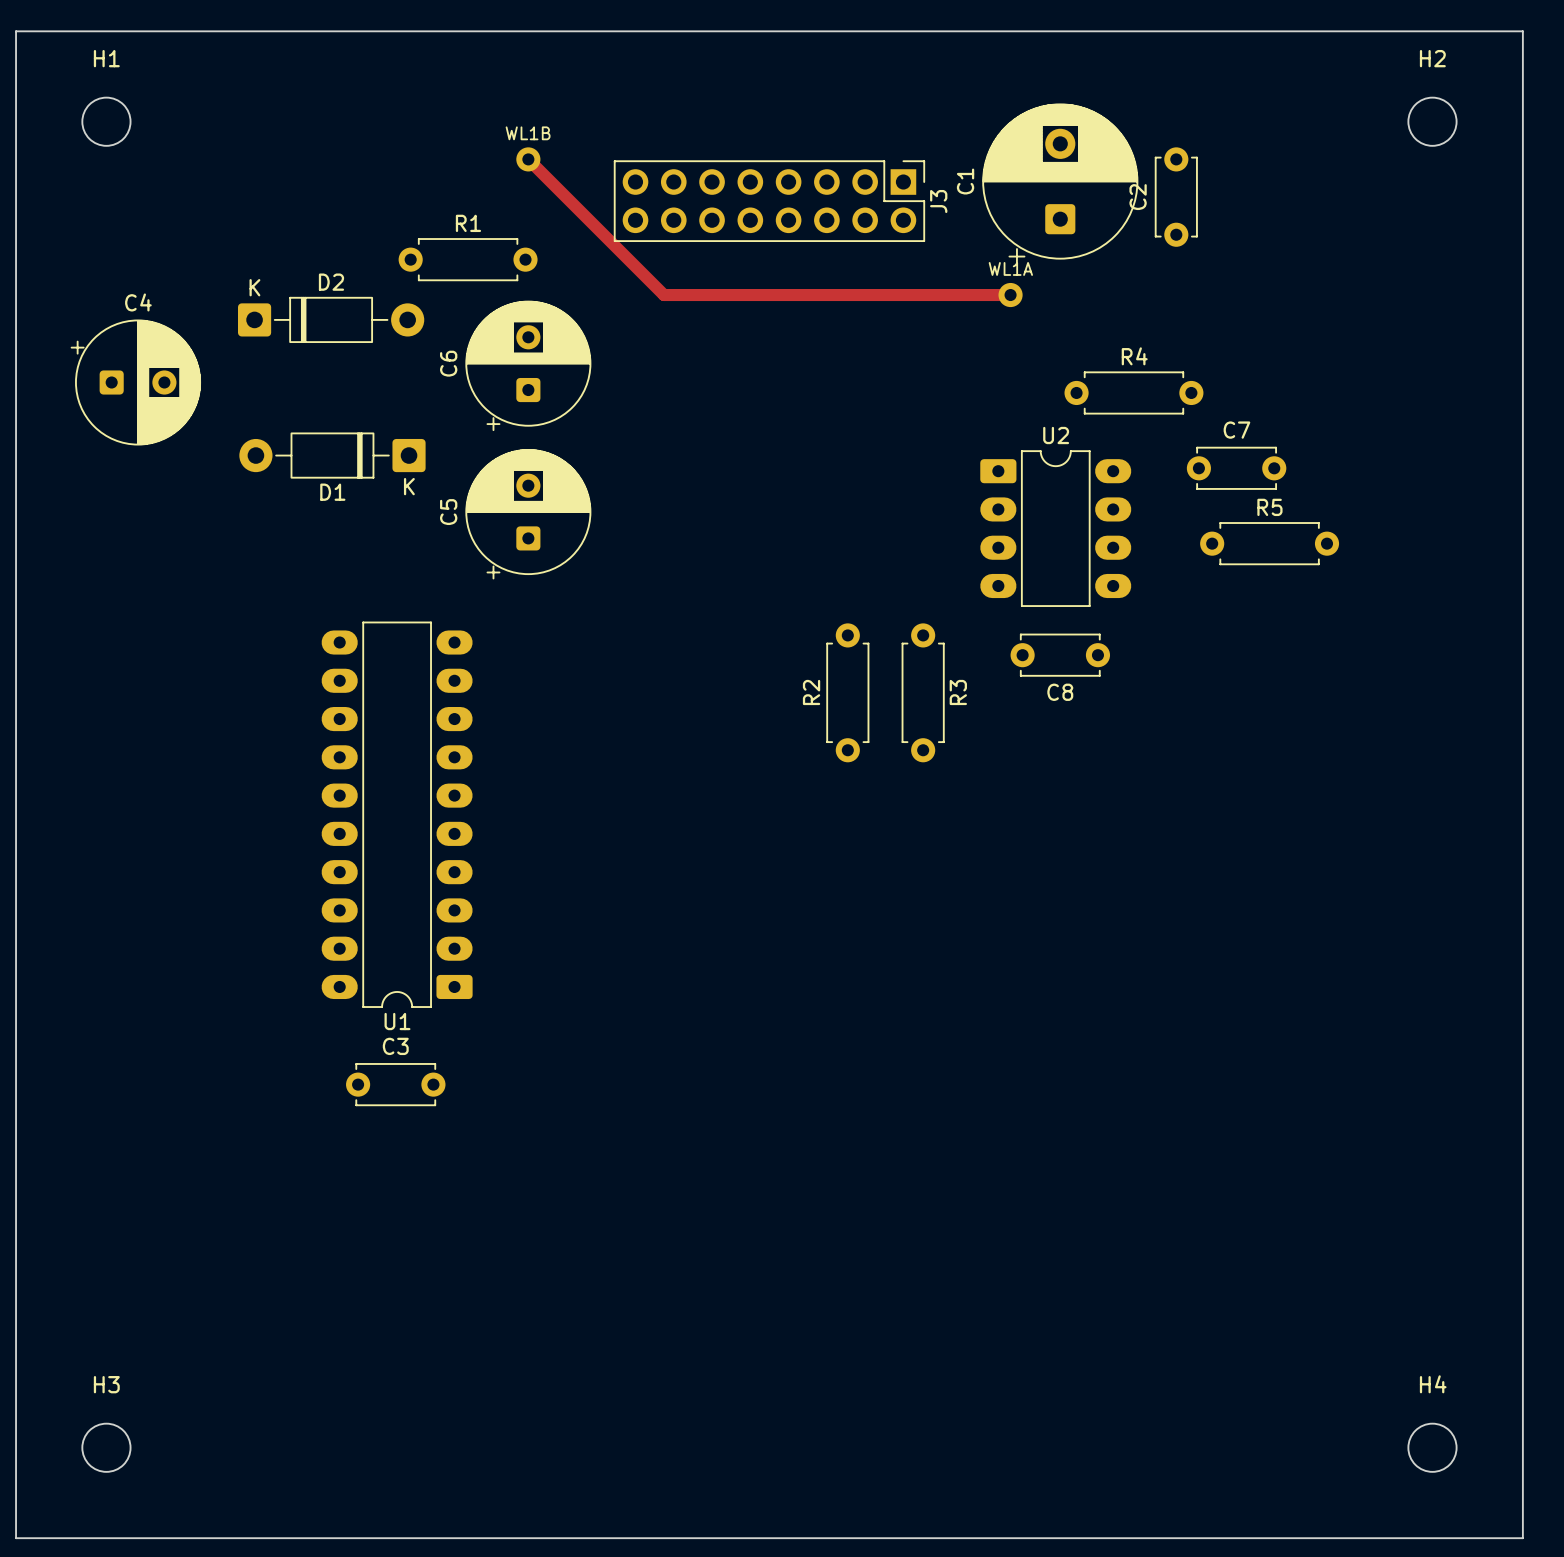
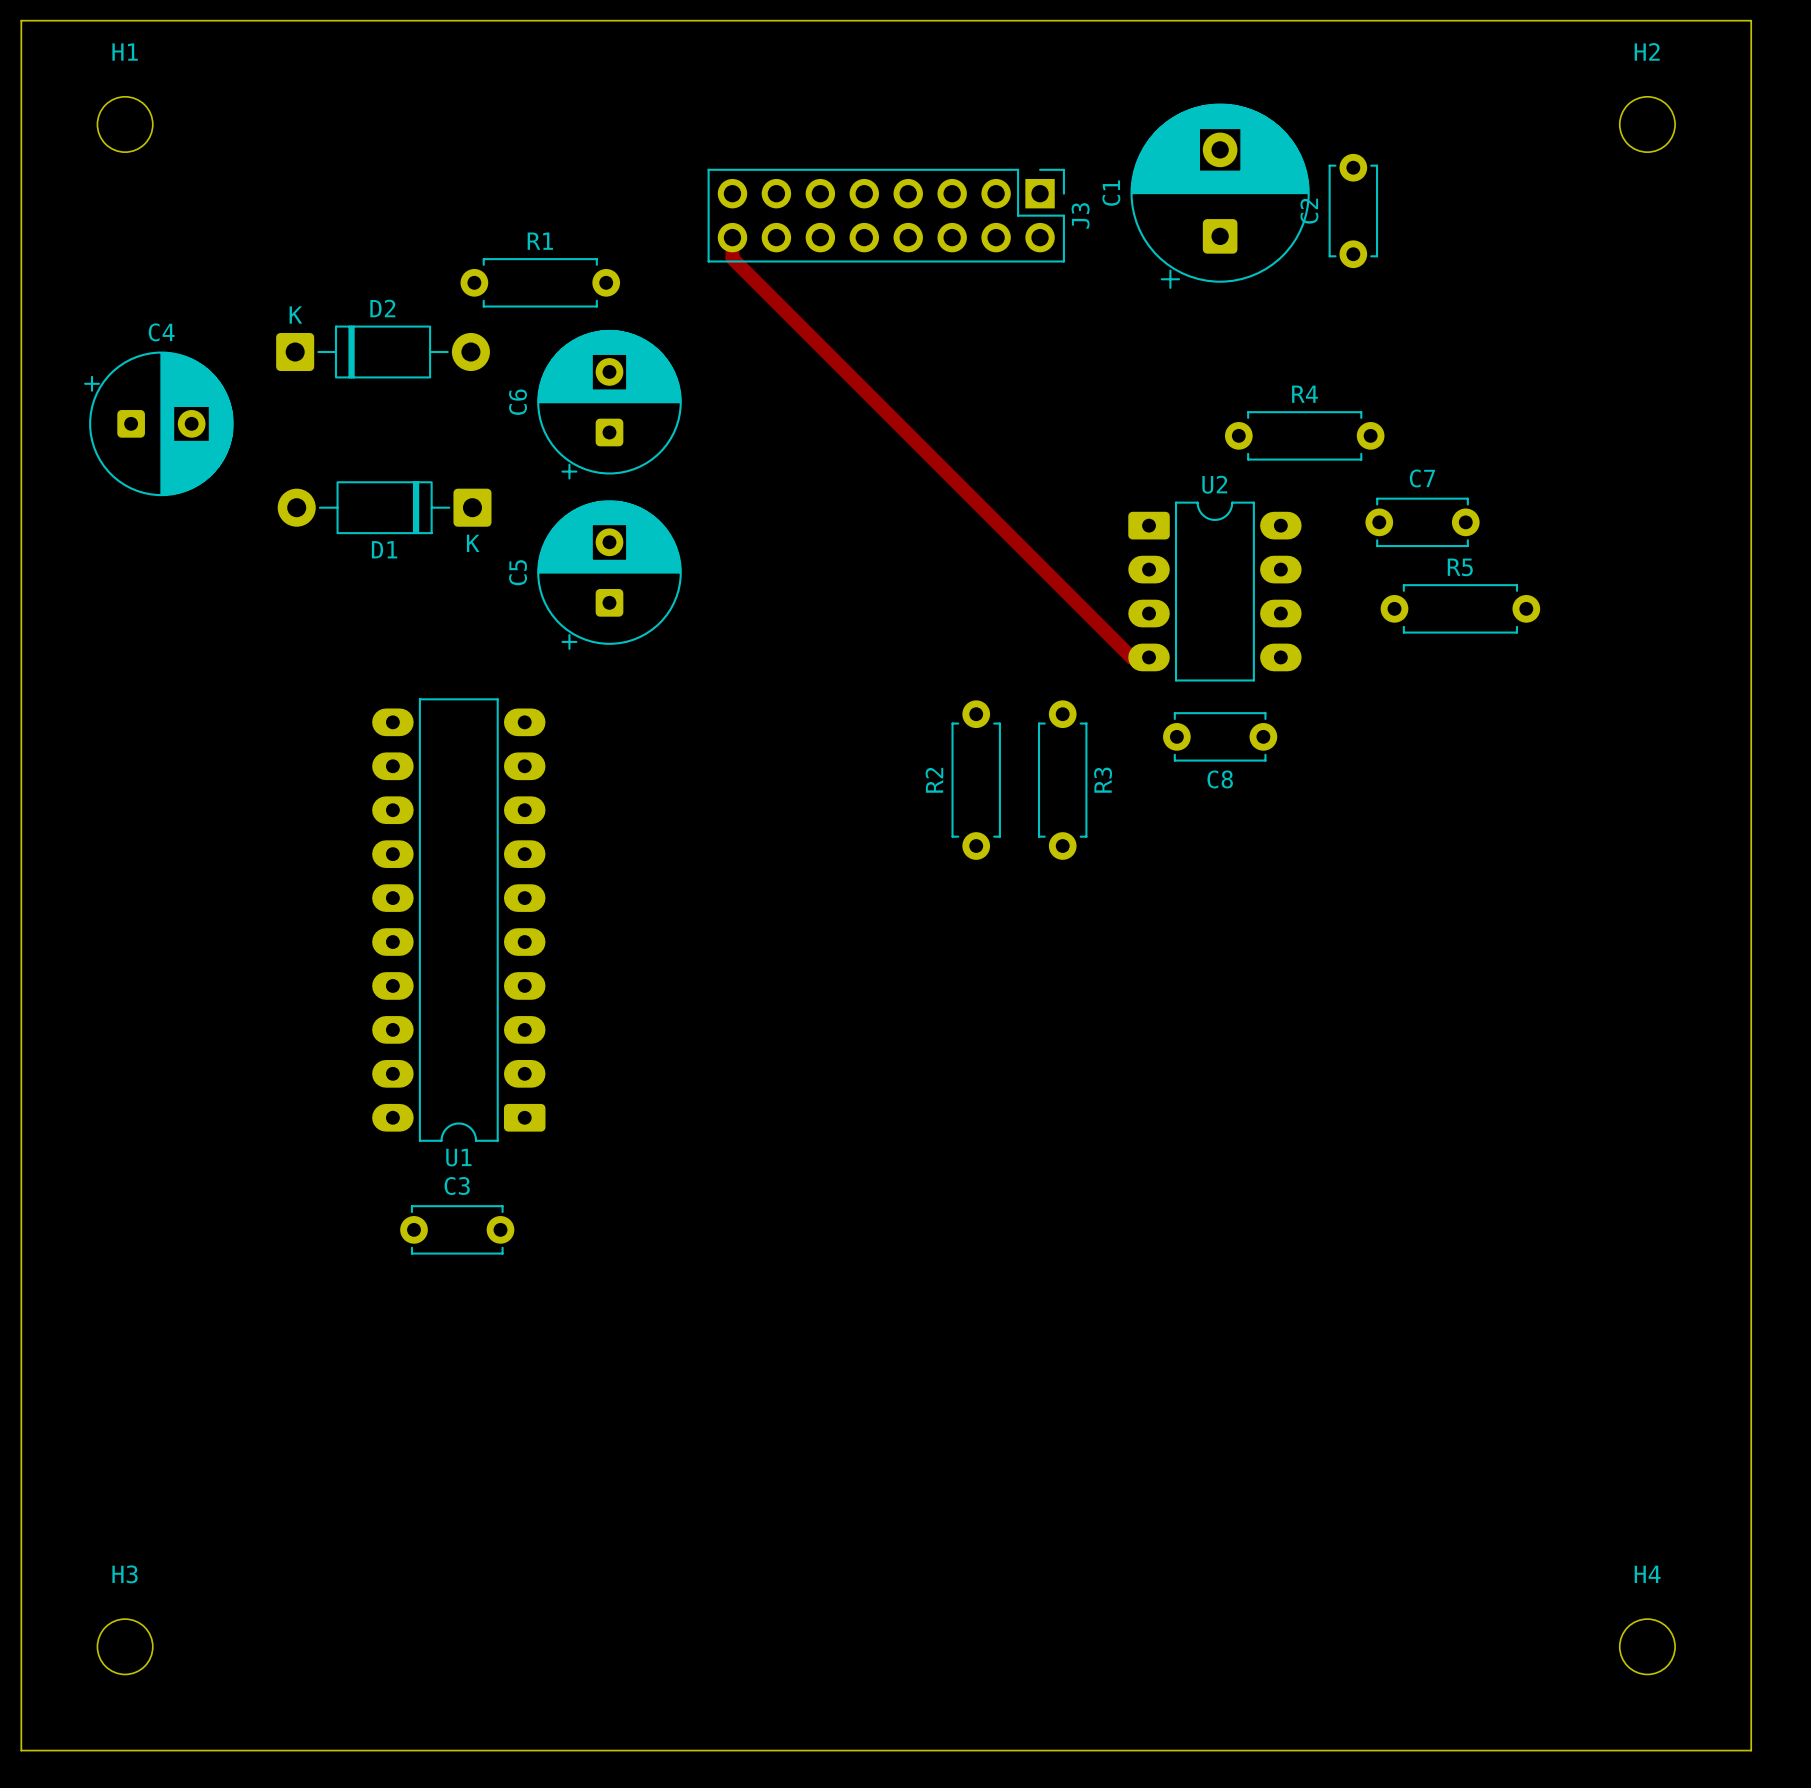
track: (528, 159) (663, 295) (1010, 295) -> none
WL1B: (528, 159) -> none
track: none -> (732, 237) (732, 258) (1131, 657) (1149, 657)
WL1A: (1010, 295) -> none

